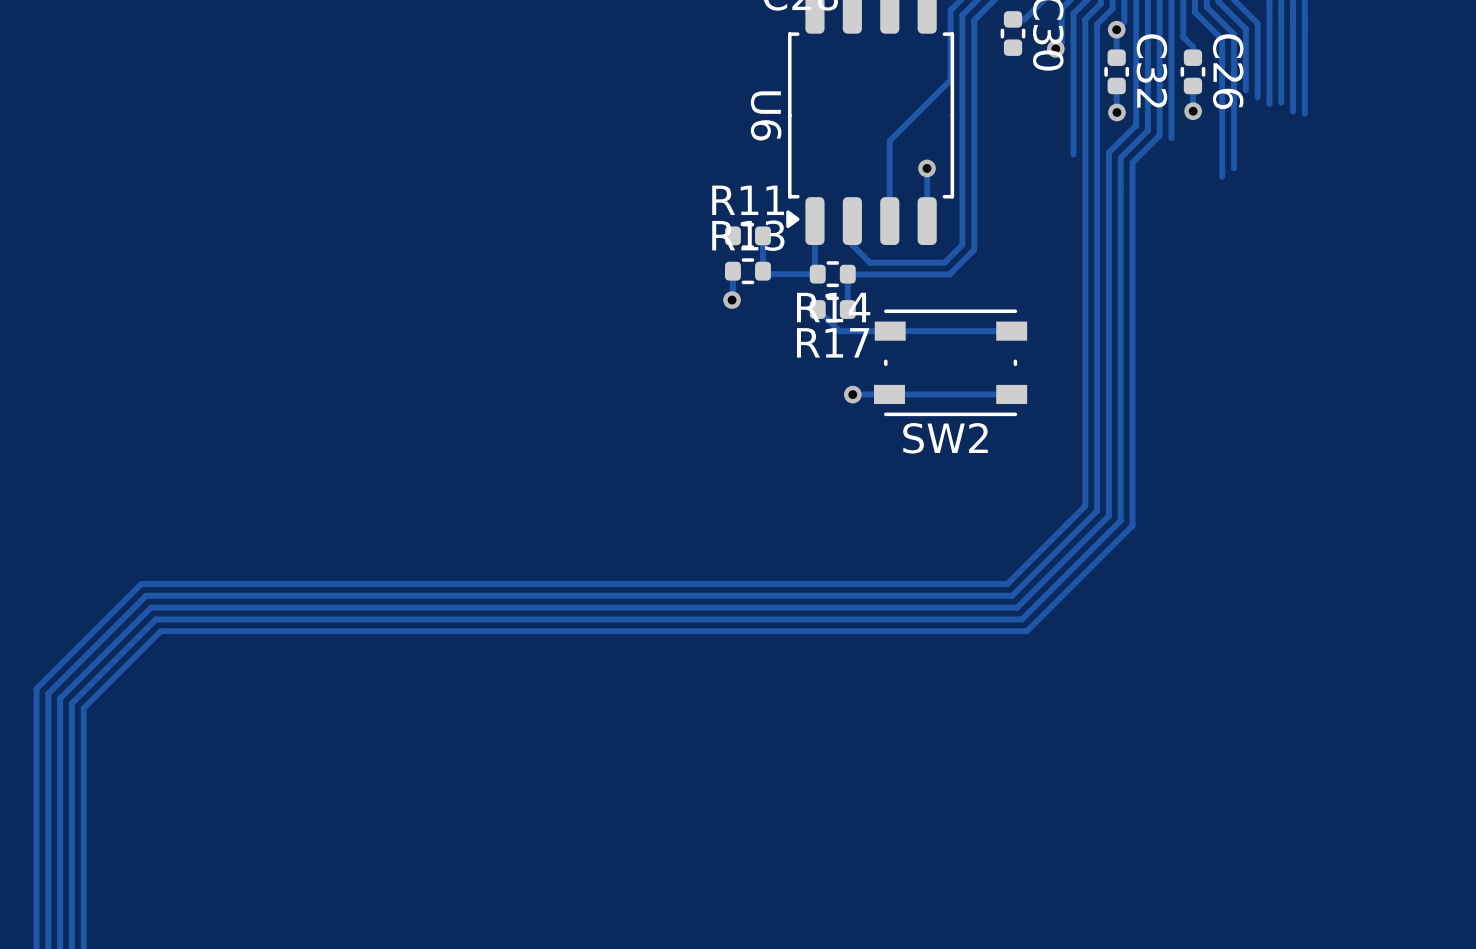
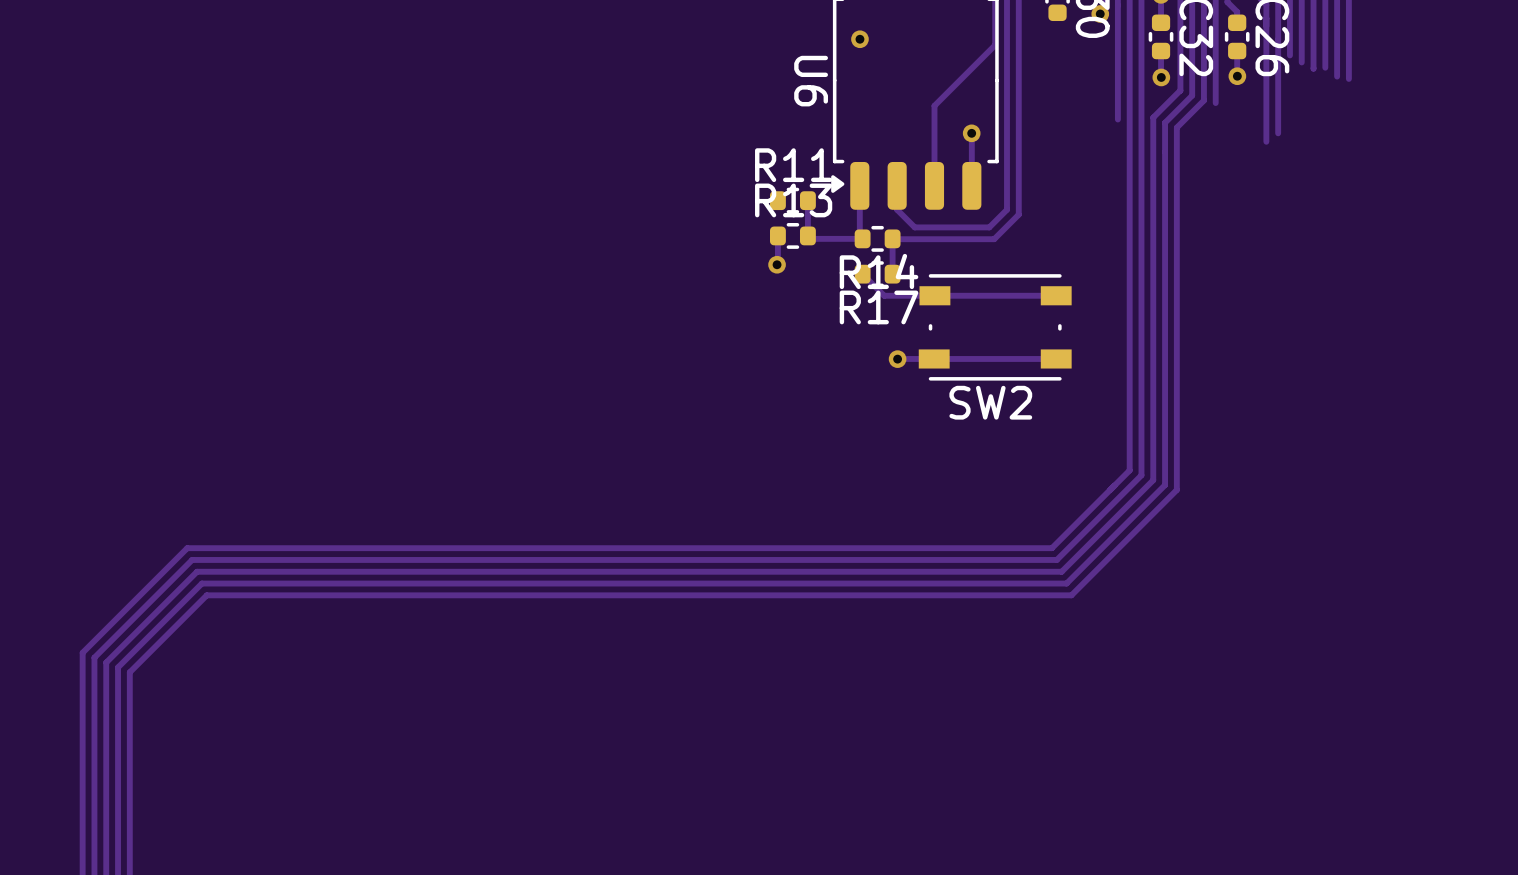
via: none -> (859, 39)

